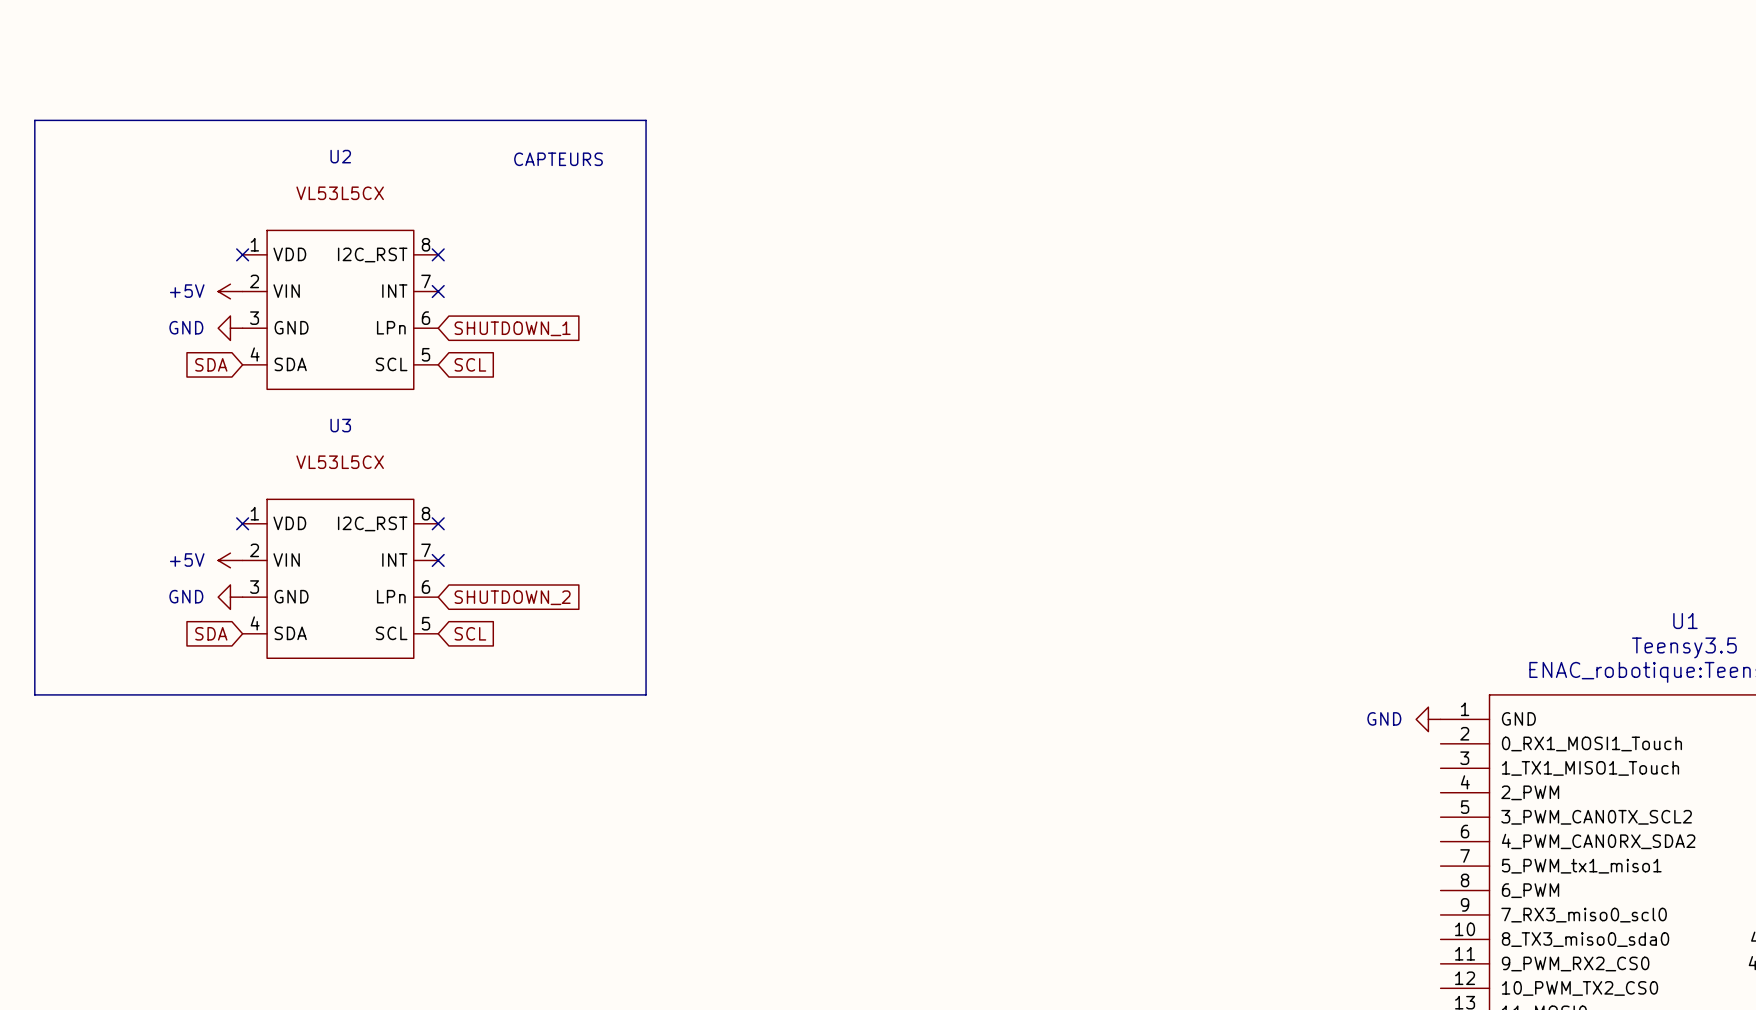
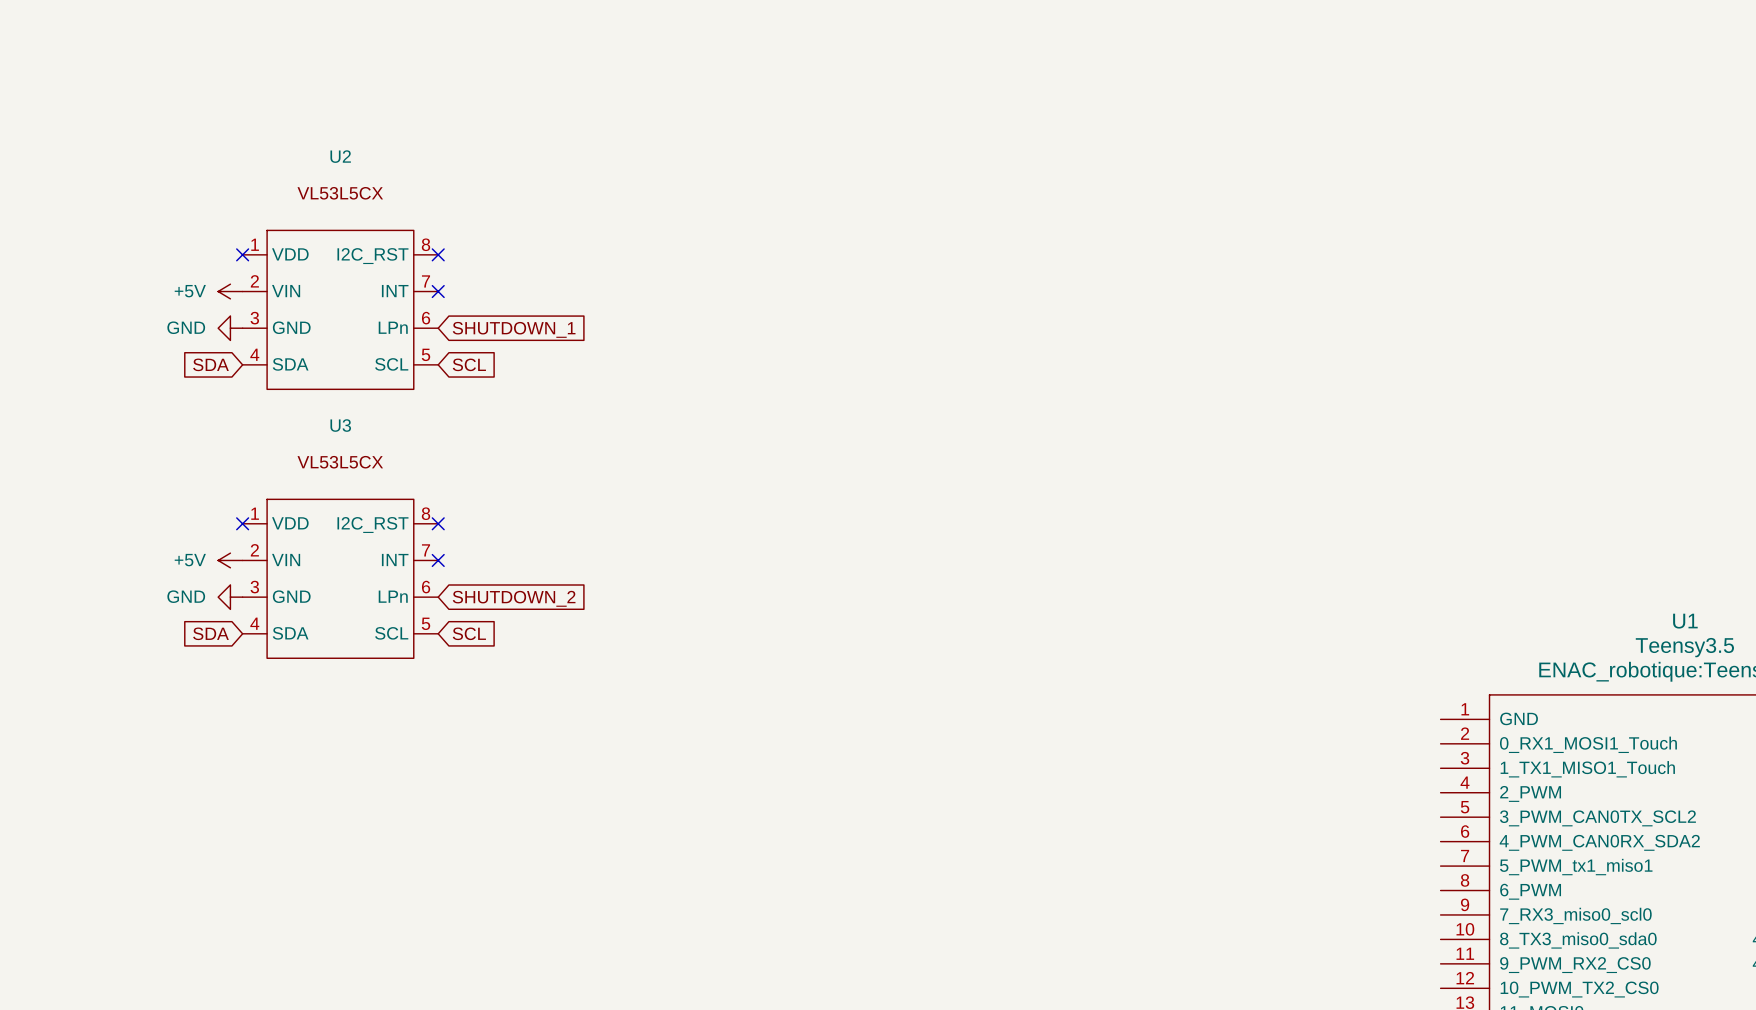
line: (34, 120) (646, 120) (646, 694) (34, 694) (34, 120) -> none
text: CAPTEURS (558, 159) -> none
power symbol: GND (1428, 719) -> none

